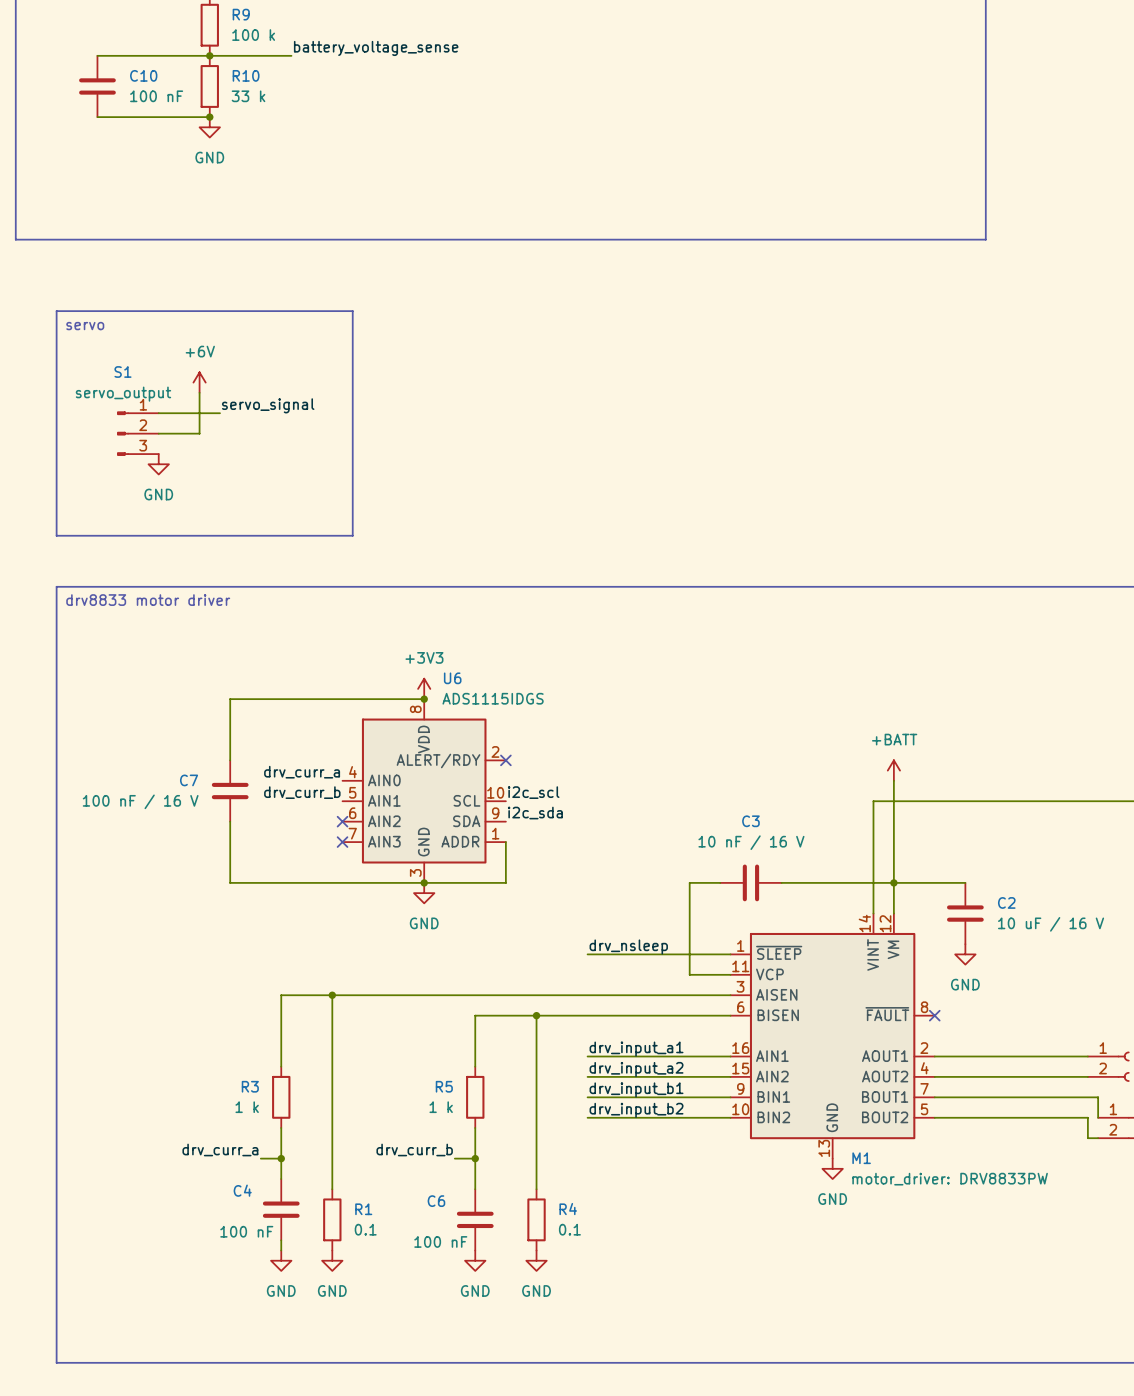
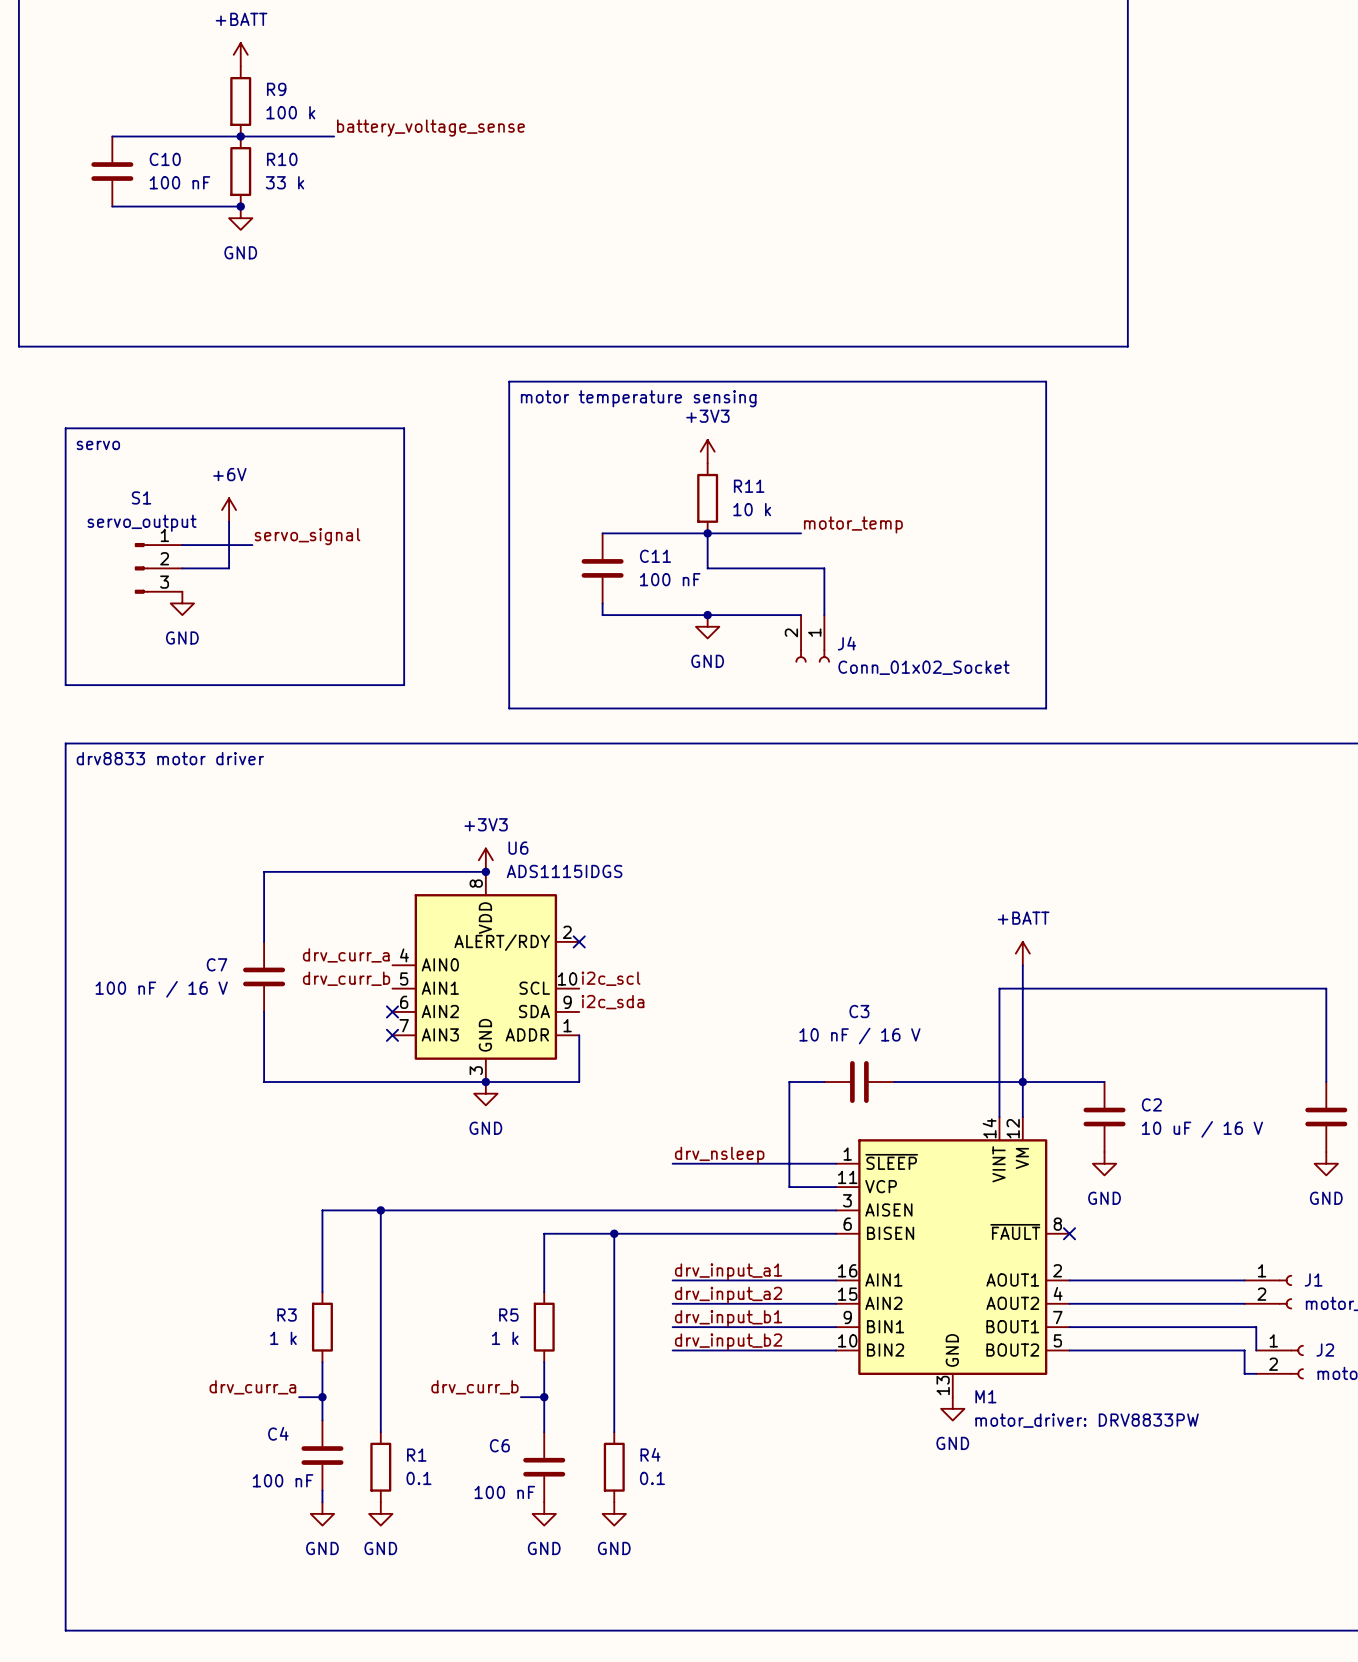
line: none -> (509, 381) (1046, 381) (1046, 708) (509, 708) (509, 381)
text: none -> motor temperature sensing (638, 398)
power symbol: none -> +3V3 (707, 451)
R11: none -> 10 k (707, 498)
label: none -> motor_temp (853, 524)
wire: none -> (602, 533) (801, 533)
wire: none -> (707, 533) (707, 568) (824, 568) (824, 615)
junction: none -> (707, 533)
C11: none -> 100 nF (602, 568)
wire: none -> (602, 603) (602, 615) (801, 615)
junction: none -> (707, 615)
power symbol: none -> GND (707, 626)
J4: none -> Conn_01x02_Socket (812, 638)

